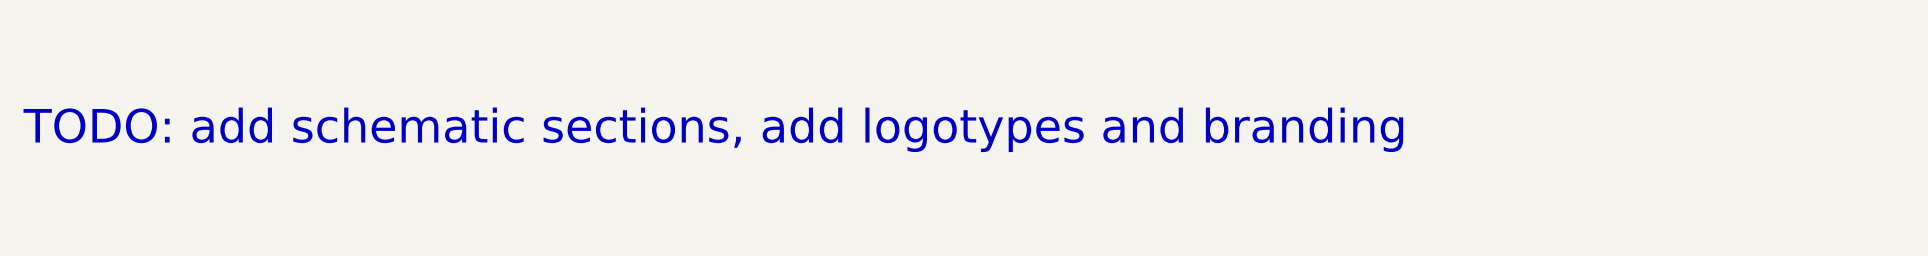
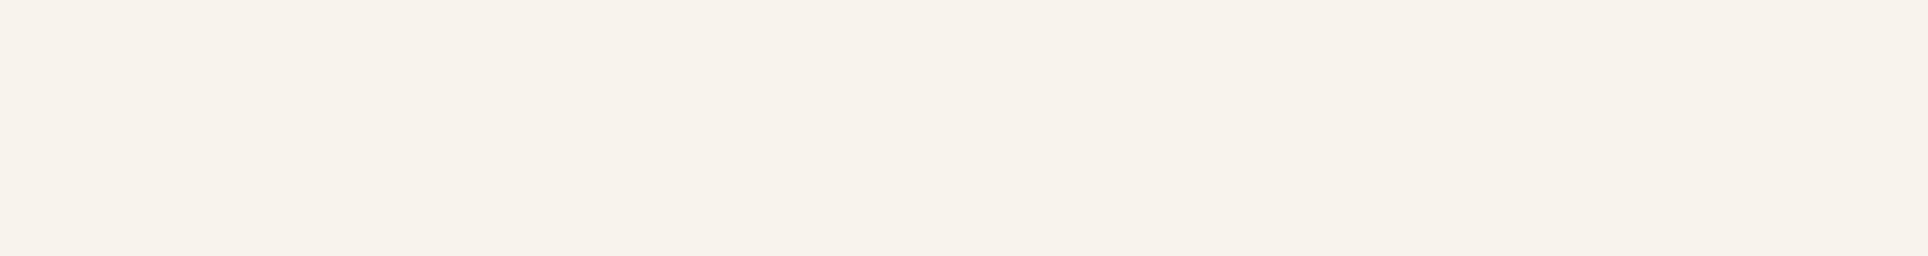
text: TODO: add schematic sections, add logotypes and branding (713, 129) -> none

